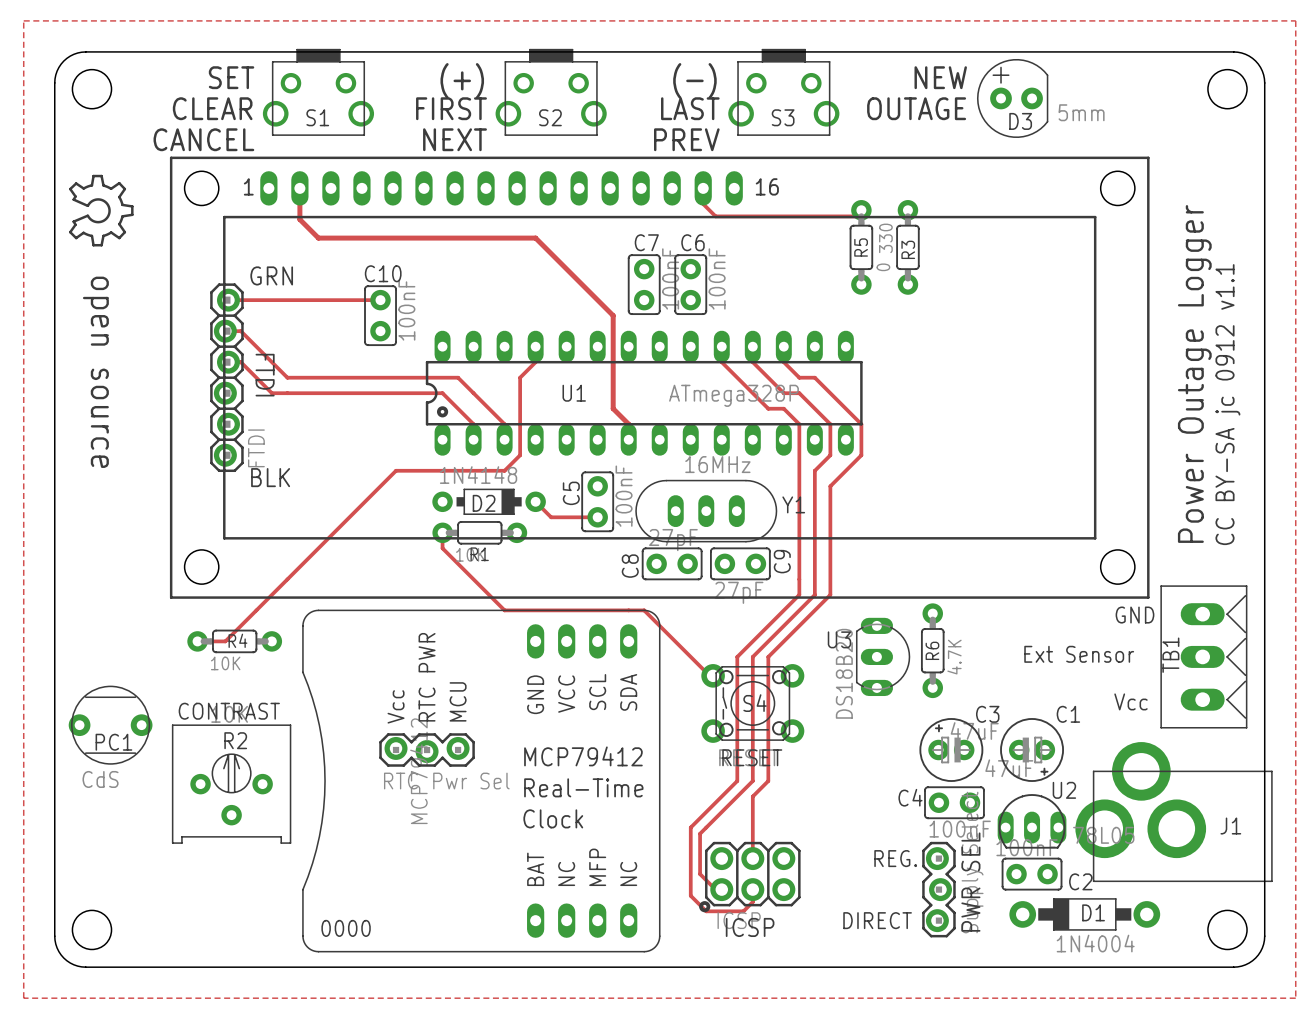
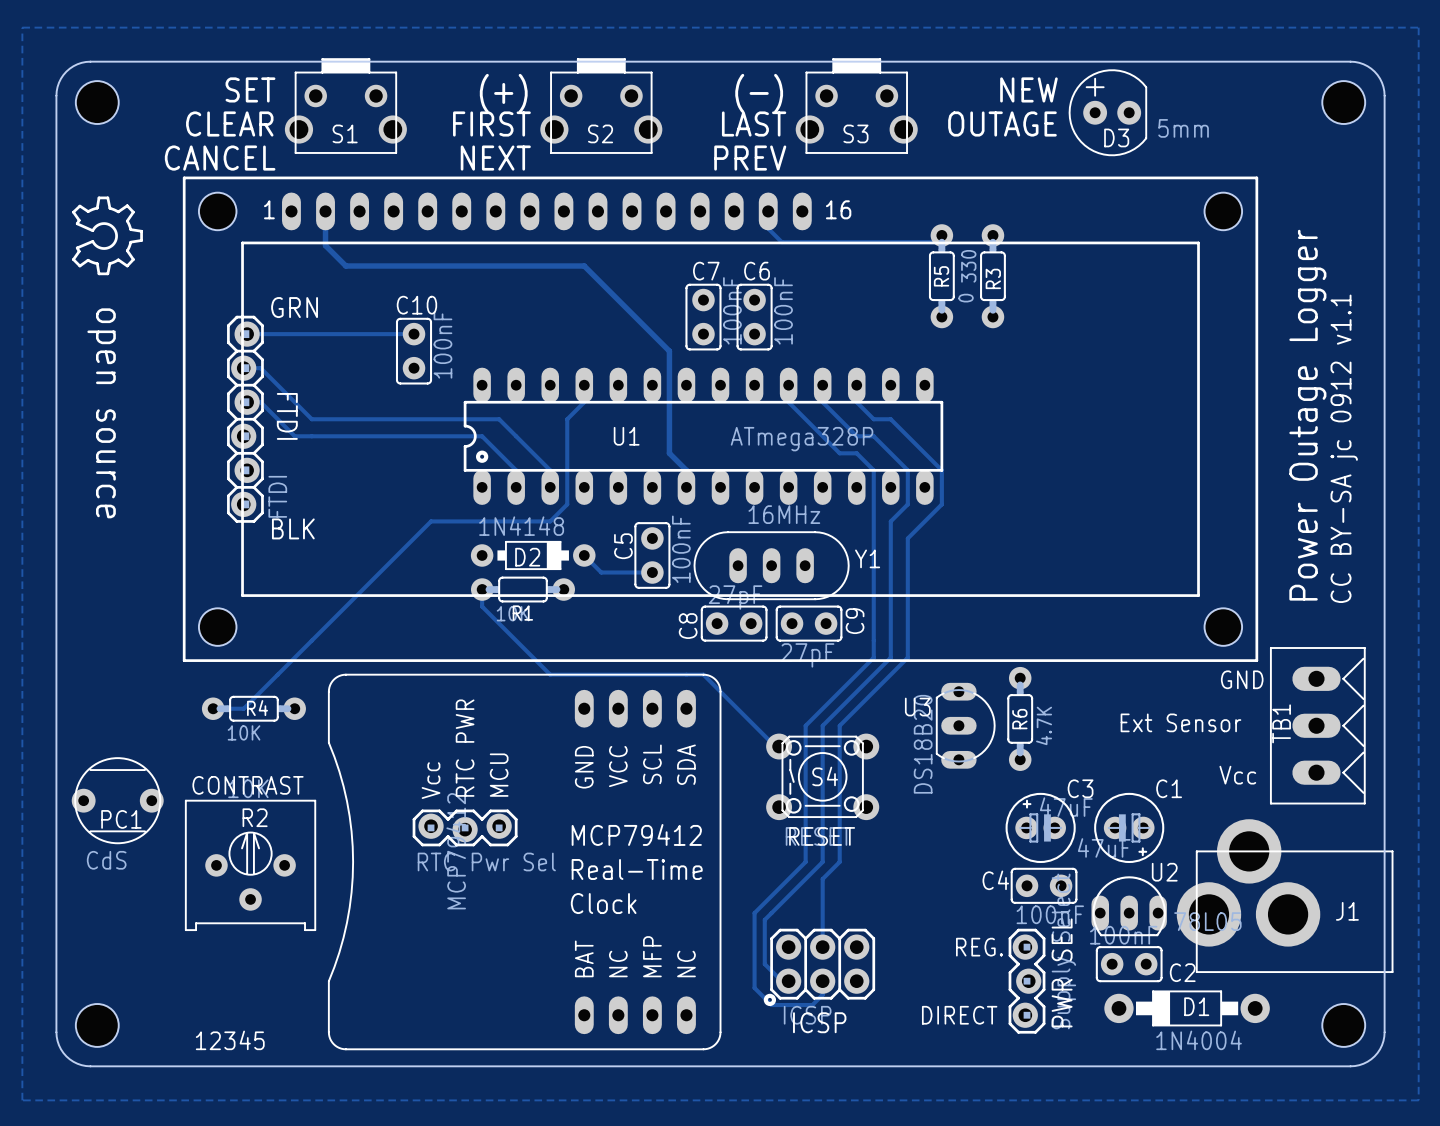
text: 0000 (346, 928) -> none
text: none -> 12345 (230, 1040)

